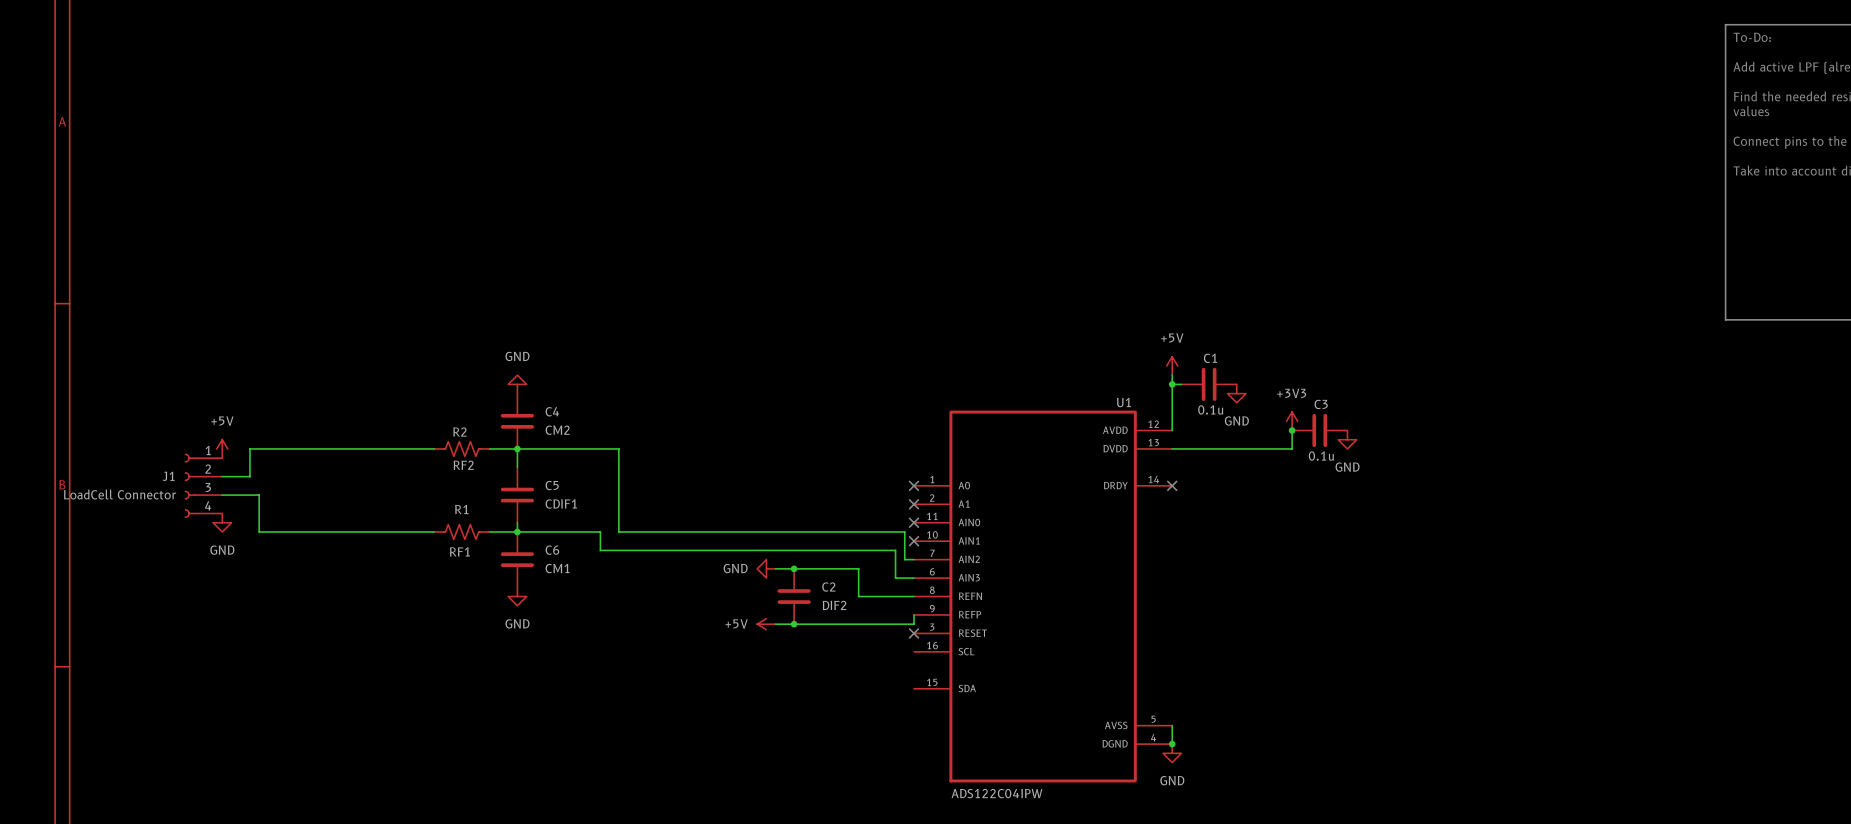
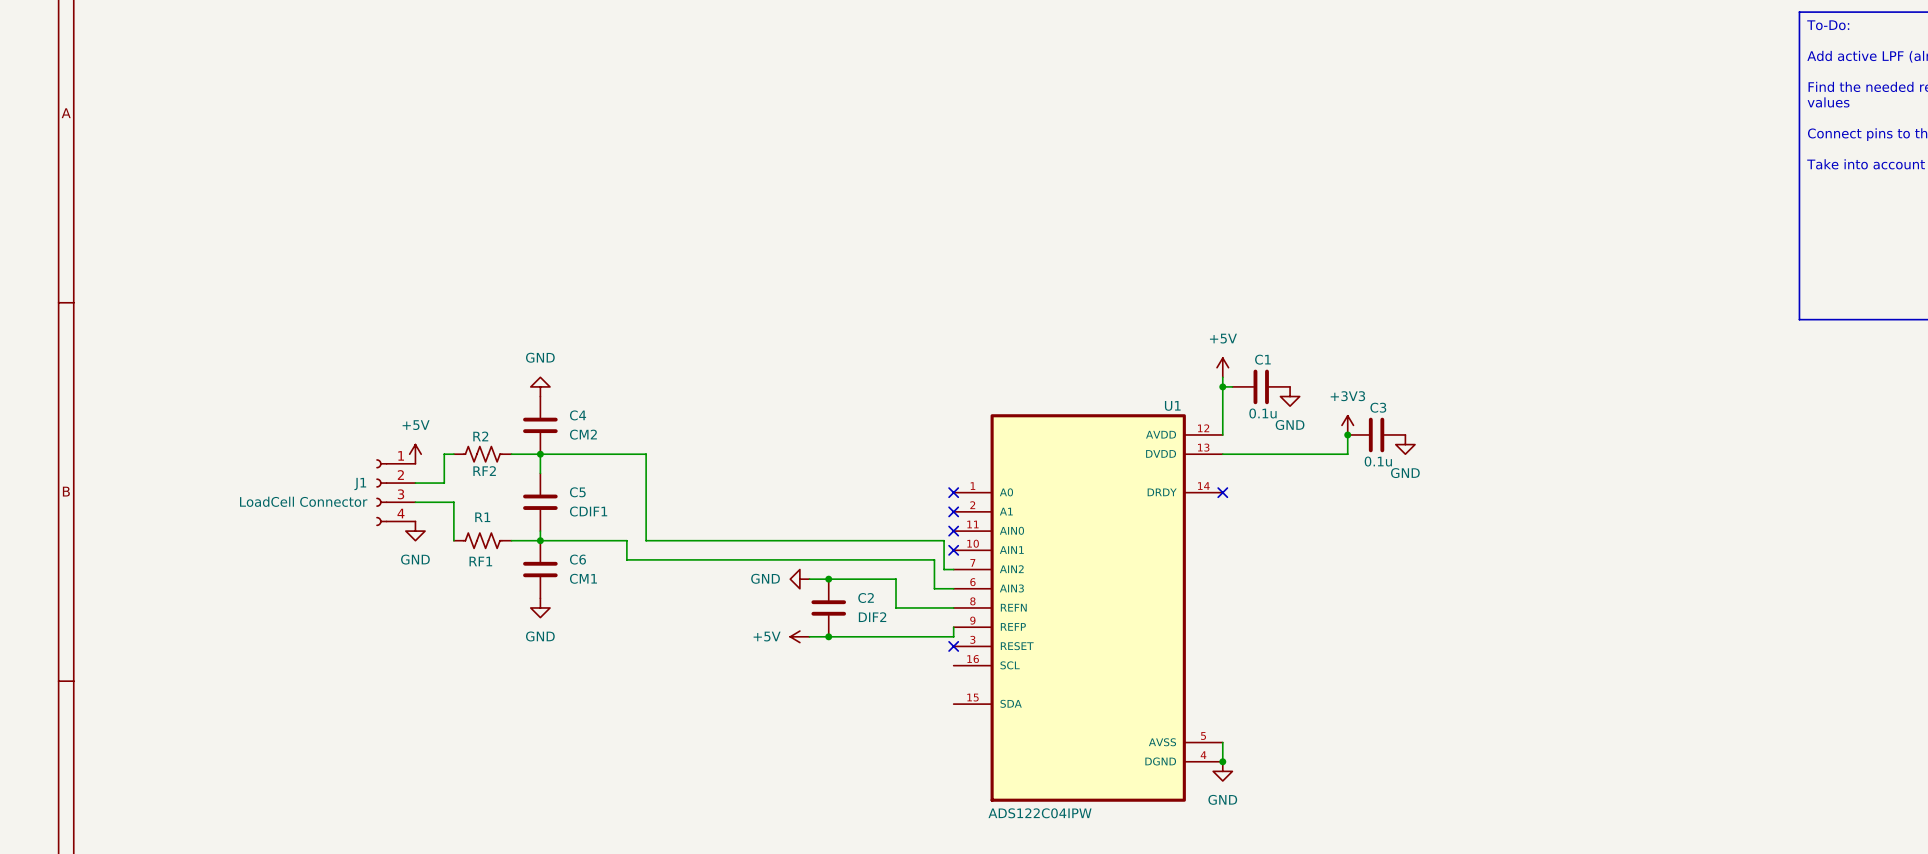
power symbol position: +5V (222, 448) -> +5V (415, 454)
wire: (425, 448) (249, 448) (249, 476) (222, 476) -> (444, 454) (444, 483) (415, 483)
J1 position: (203, 485) -> (395, 492)
wire: (222, 495) (259, 495) (259, 531) (434, 531) -> (415, 502) (453, 502) (453, 540)
power symbol position: GND (222, 522) -> GND (415, 531)

